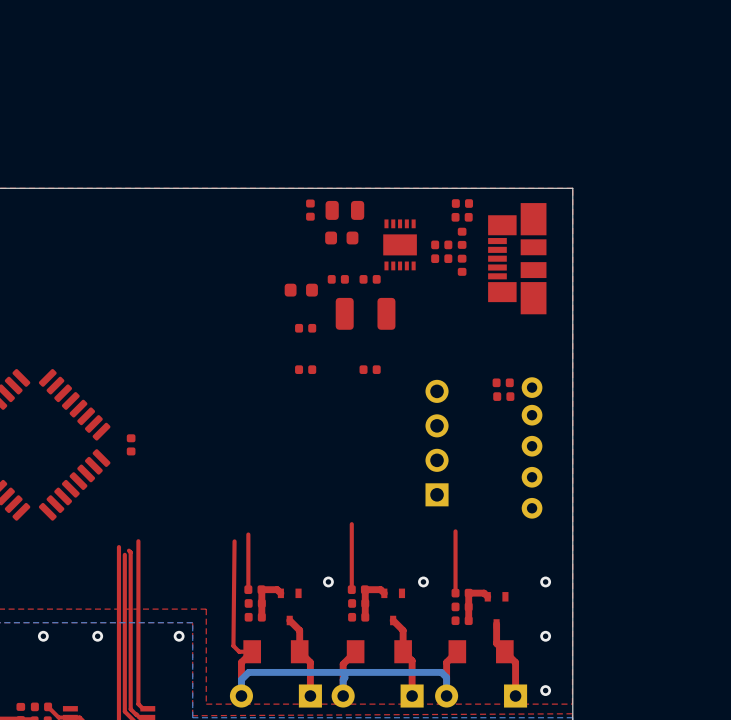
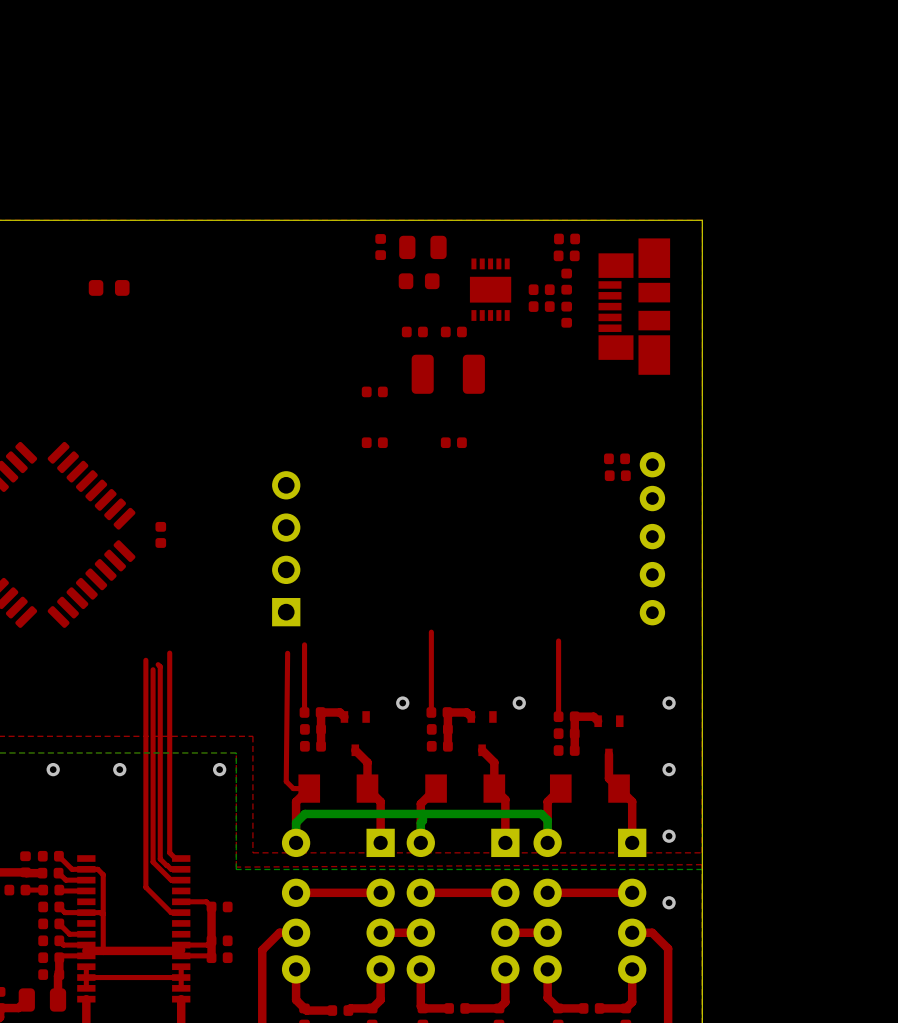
part position: (301, 290) -> (109, 287)
part position: (437, 443) -> (286, 548)

